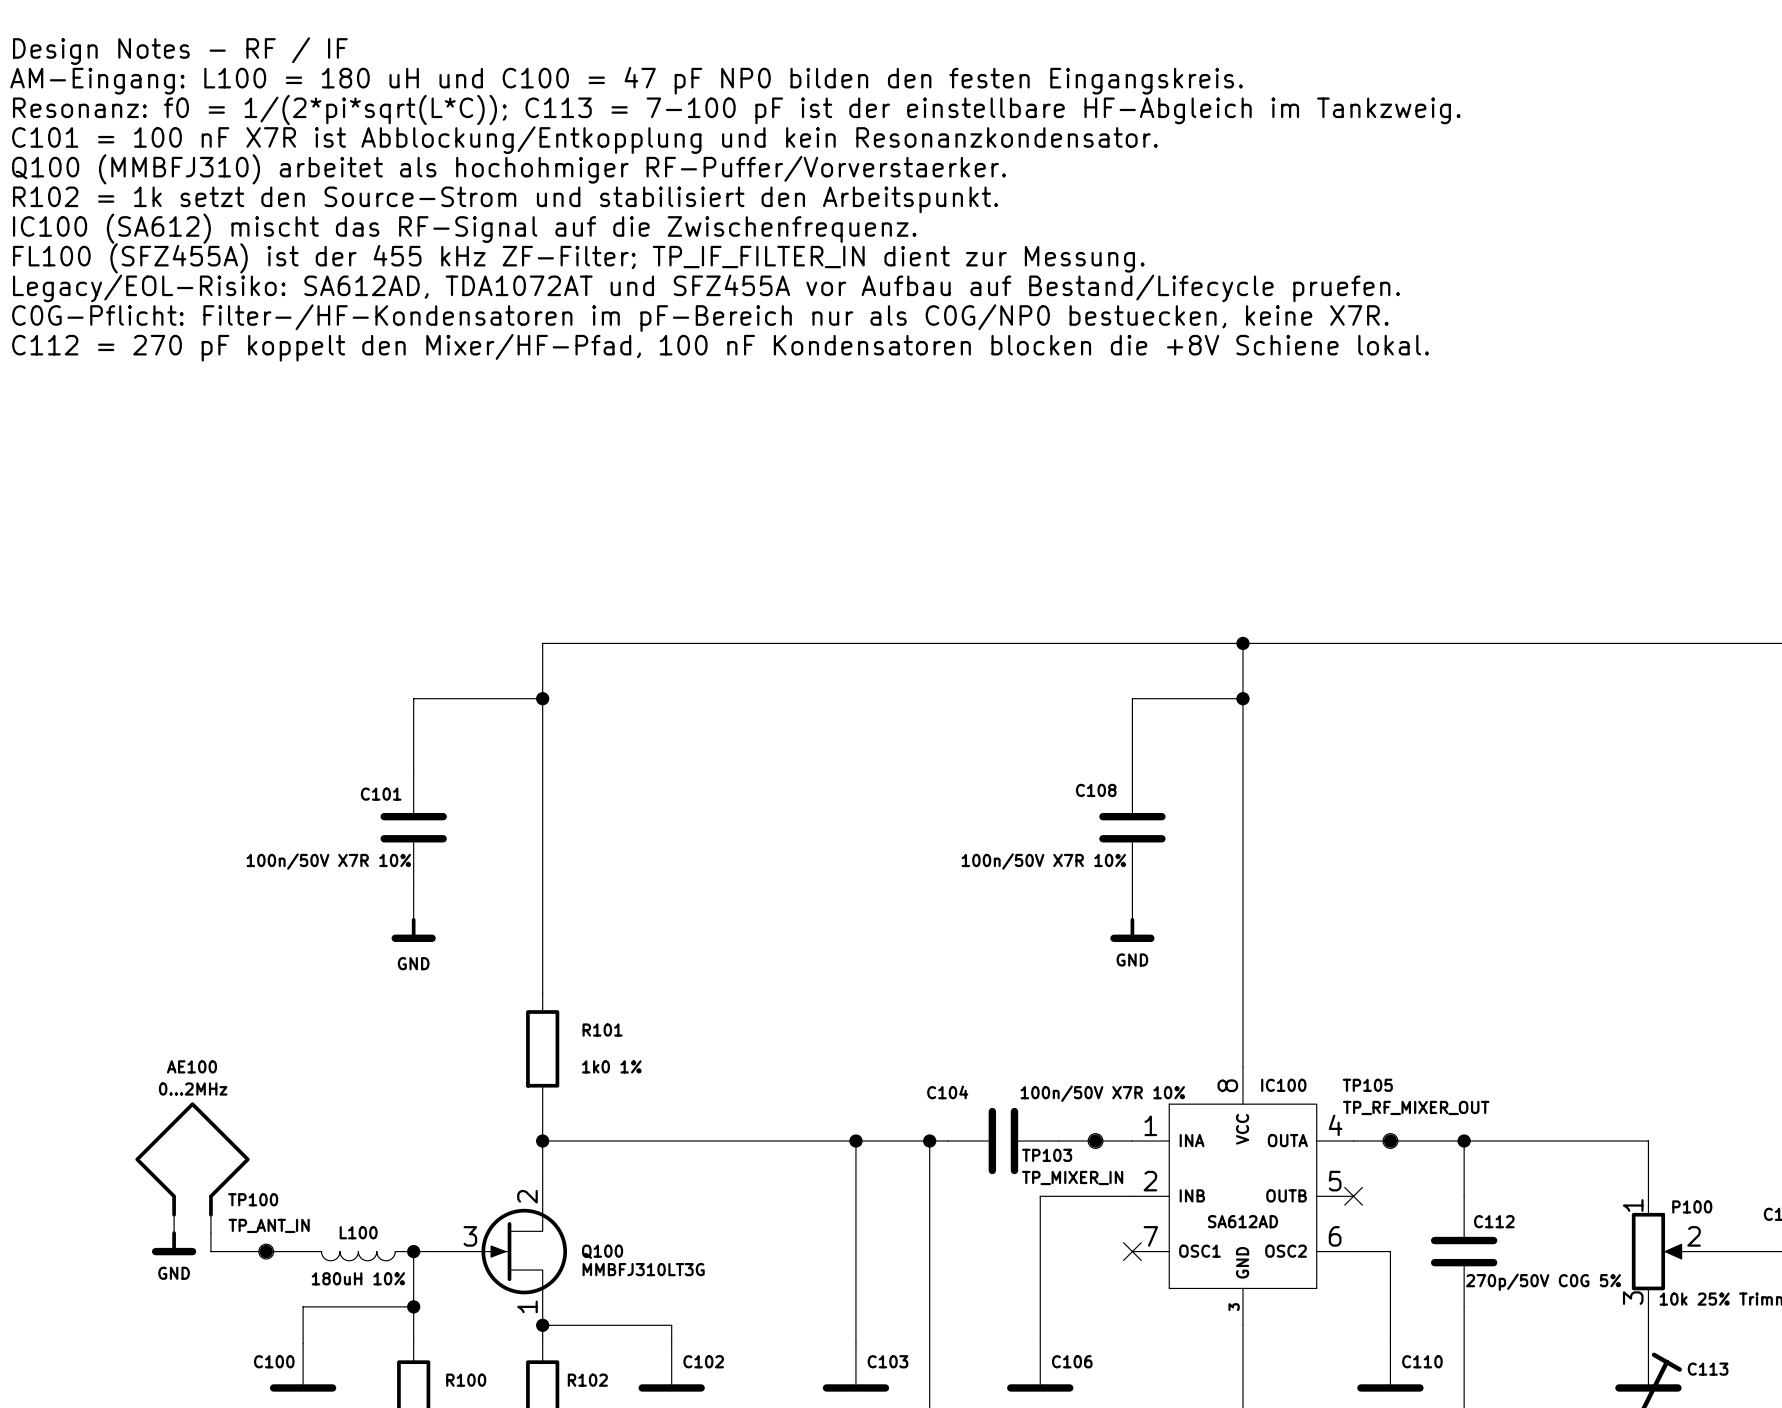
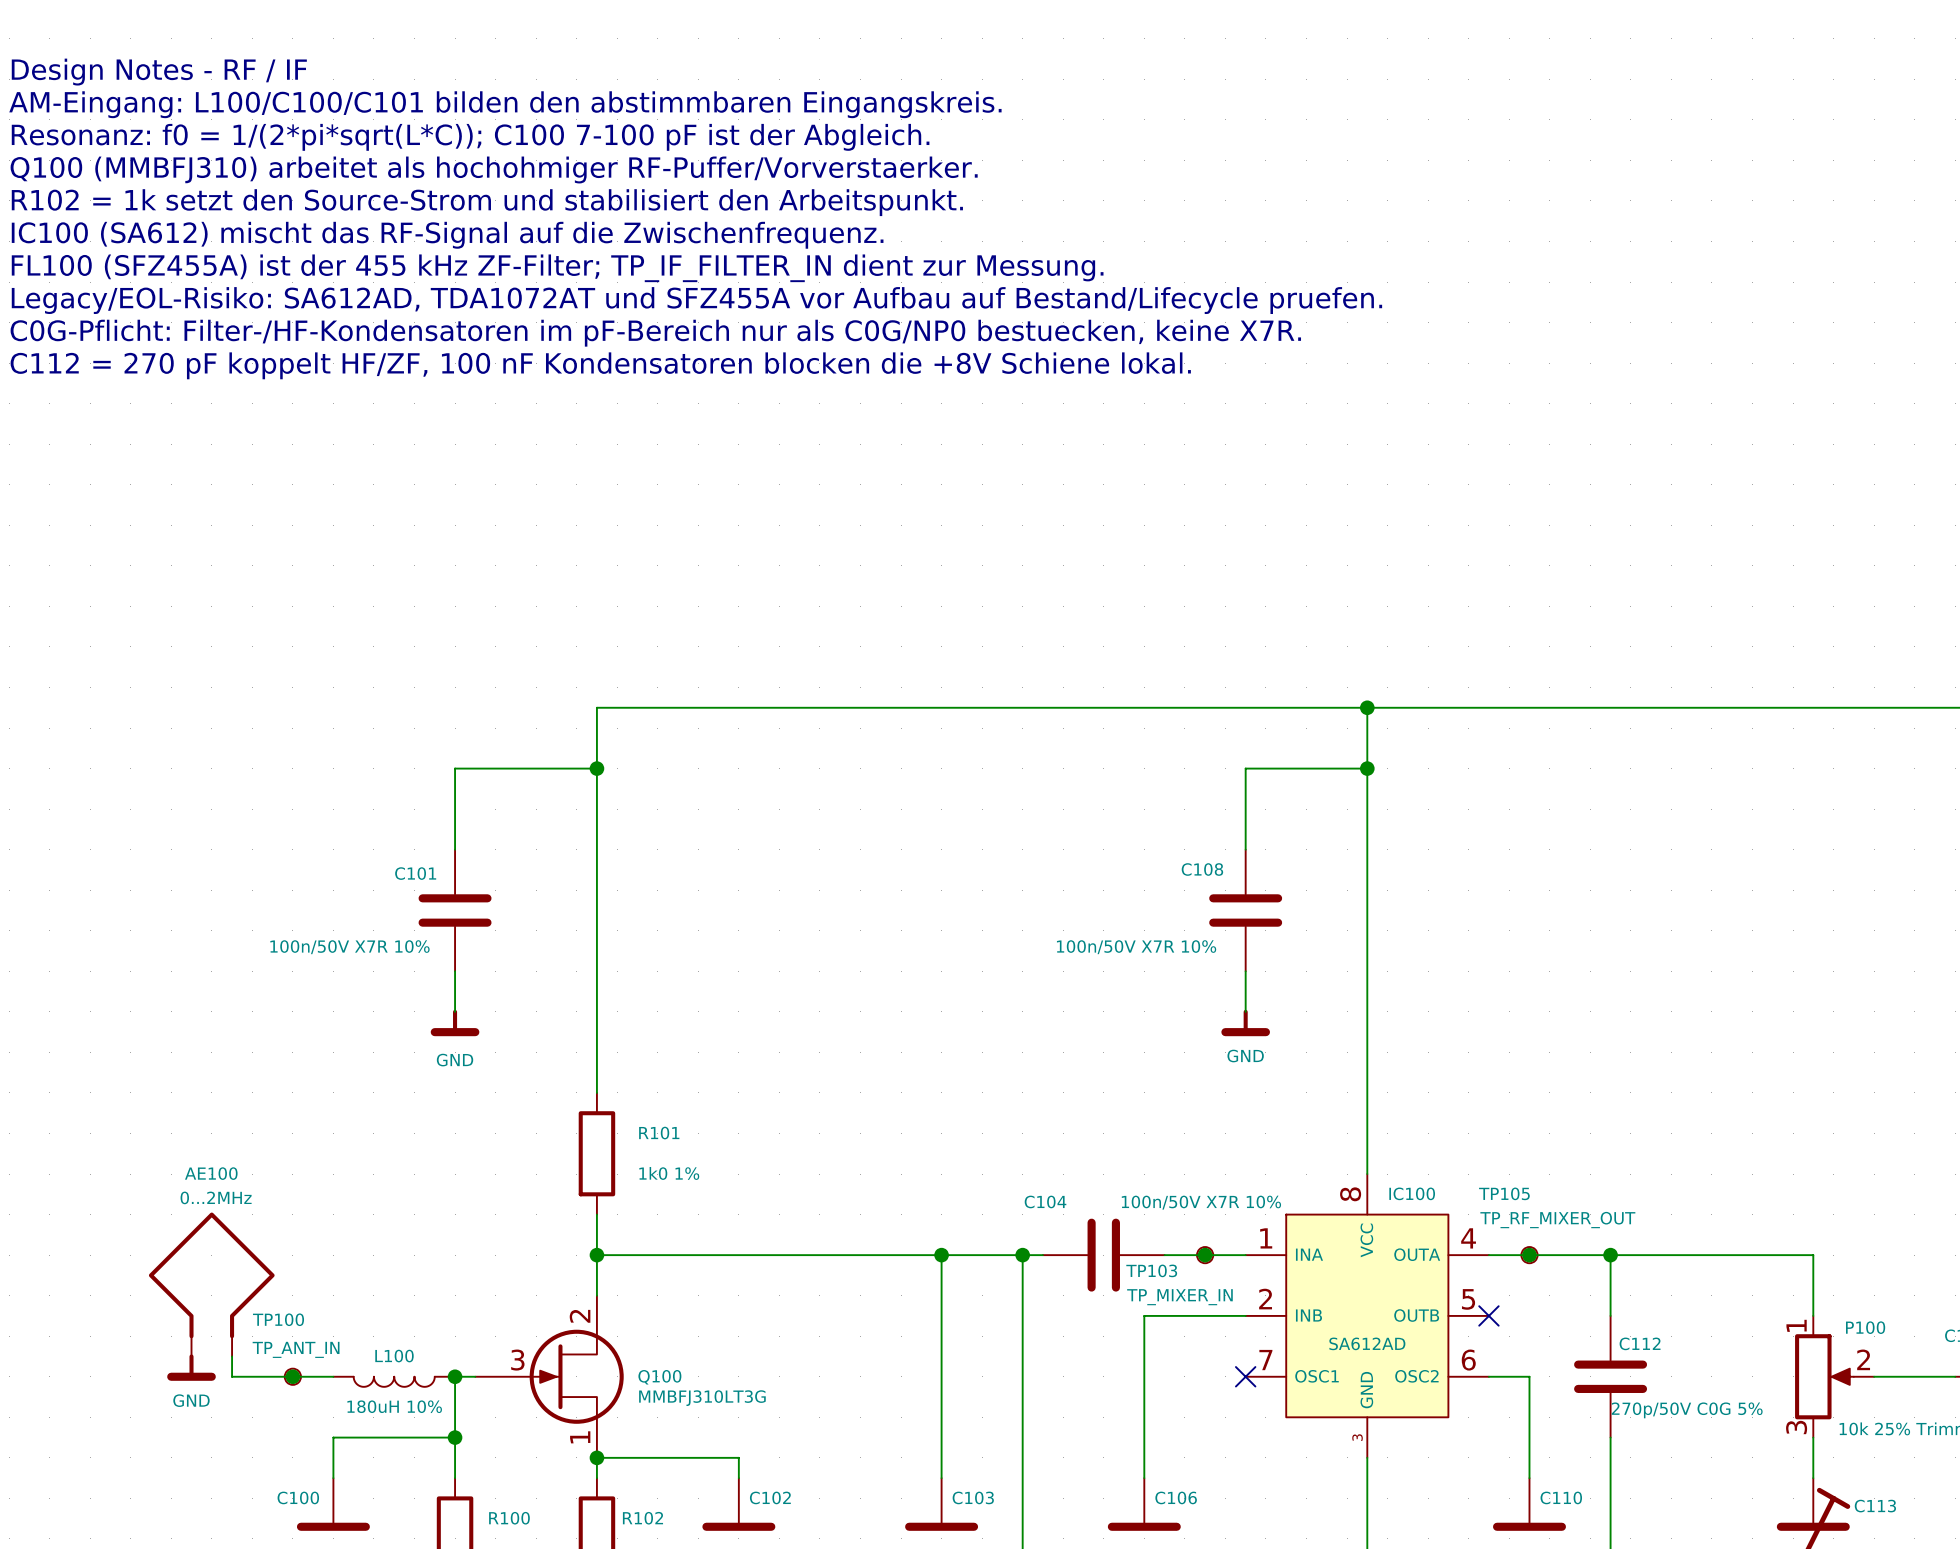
text position: Design Notes - RF / IF (180, 51) -> Design Notes - RF / IF (159, 72)
text: AM-Eingang: L100 = 180 uH und C100 = 47 pF NP0 bilden den festen Eingangskreis. (626, 80) -> AM-Eingang: L100/C100/C101 bilden den abstimmbaren Eingangskreis. (505, 104)
text: Resonanz: f0 = 1/(2*pi*sqrt(L*C)); C113 = 7-100 pF ist der einstellbare HF-Abgleich im Tankzweig. (736, 109) -> Resonanz: f0 = 1/(2*pi*sqrt(L*C)); C100 7-100 pF ist der Abgleich. (470, 137)
text: C101 = 100 nF X7R ist Abblockung/Entkopplung und kein Resonanzkondensator. (584, 140) -> none
text position: Q100 (MMBFJ310) arbeitet als hochohmiger RF-Puffer/Vorverstaerker. (509, 169) -> Q100 (MMBFJ310) arbeitet als hochohmiger RF-Puffer/Vorverstaerker. (494, 169)
text position: R102 = 1k setzt den Source-Strom und stabilisiert den Arbeitspunkt. (505, 199) -> R102 = 1k setzt den Source-Strom und stabilisiert den Arbeitspunkt. (487, 202)
text position: IC100 (SA612) mischt das RF-Signal auf die Zwischenfrequenz. (464, 228) -> IC100 (SA612) mischt das RF-Signal auf die Zwischenfrequenz. (447, 235)
text position: FL100 (SFZ455A) ist der 455 kHz ZF-Filter; TP_IF_FILTER_IN dient zur Messung. (578, 258) -> FL100 (SFZ455A) ist der 455 kHz ZF-Filter; TP_IF_FILTER_IN dient zur Messung. (557, 268)
text position: Legacy/EOL-Risiko: SA612AD, TDA1072AT und SFZ455A vor Aufbau auf Bestand/Lifecycle pruefen. (706, 288) -> Legacy/EOL-Risiko: SA612AD, TDA1072AT und SFZ455A vor Aufbau auf Bestand/Lifecycle pruefen. (696, 300)
text position: C0G-Pflicht: Filter-/HF-Kondensatoren im pF-Bereich nur als C0G/NP0 bestuecken, keine X7R. (700, 318) -> C0G-Pflicht: Filter-/HF-Kondensatoren im pF-Bereich nur als C0G/NP0 bestuecken, keine X7R. (655, 333)
text: C112 = 270 pF koppelt den Mixer/HF-Pfad, 100 nF Kondensatoren blocken die +8V Schiene lokal. (720, 347) -> C112 = 270 pF koppelt HF/ZF, 100 nF Kondensatoren blocken die +8V Schiene lokal. (600, 365)

